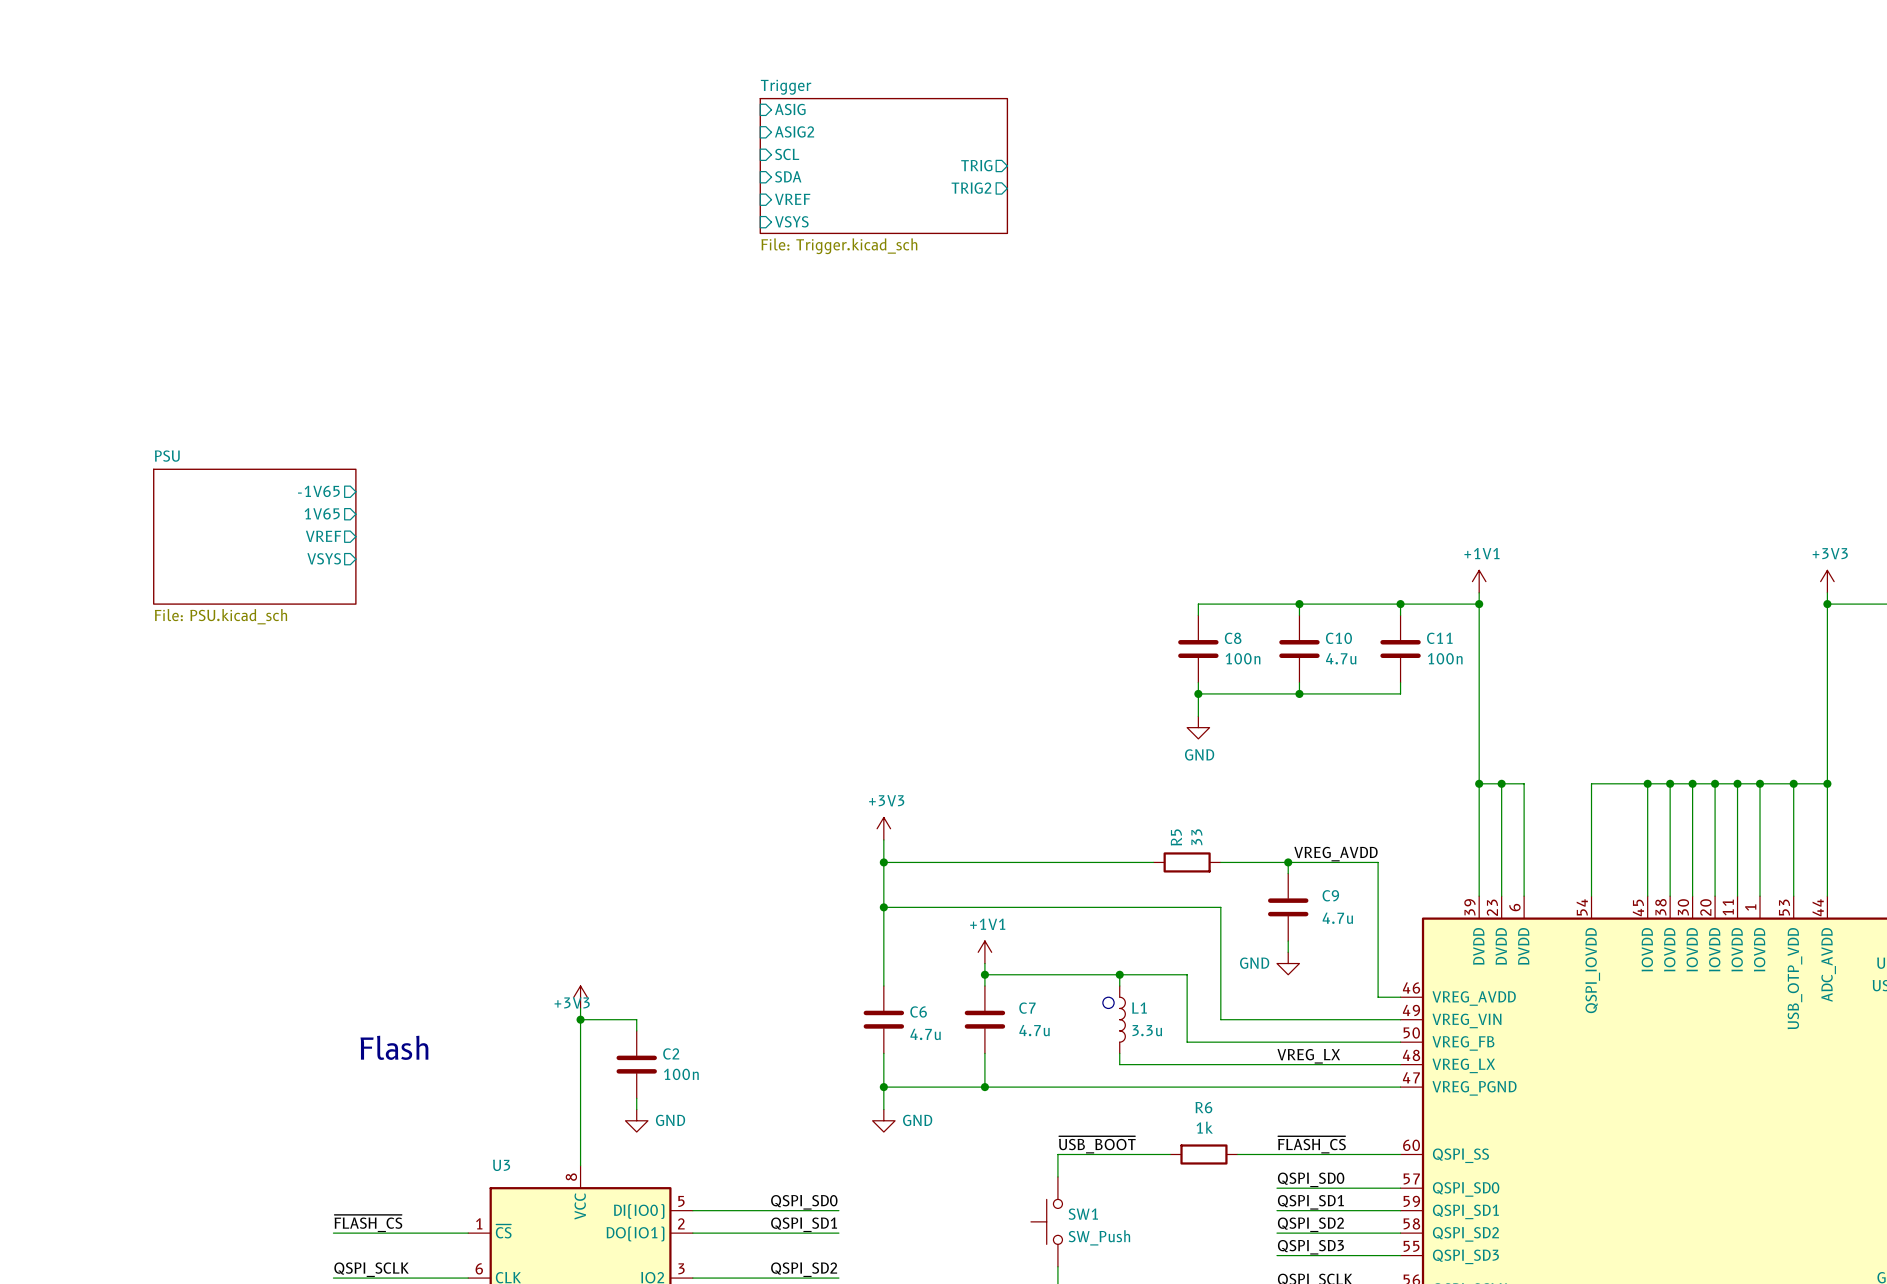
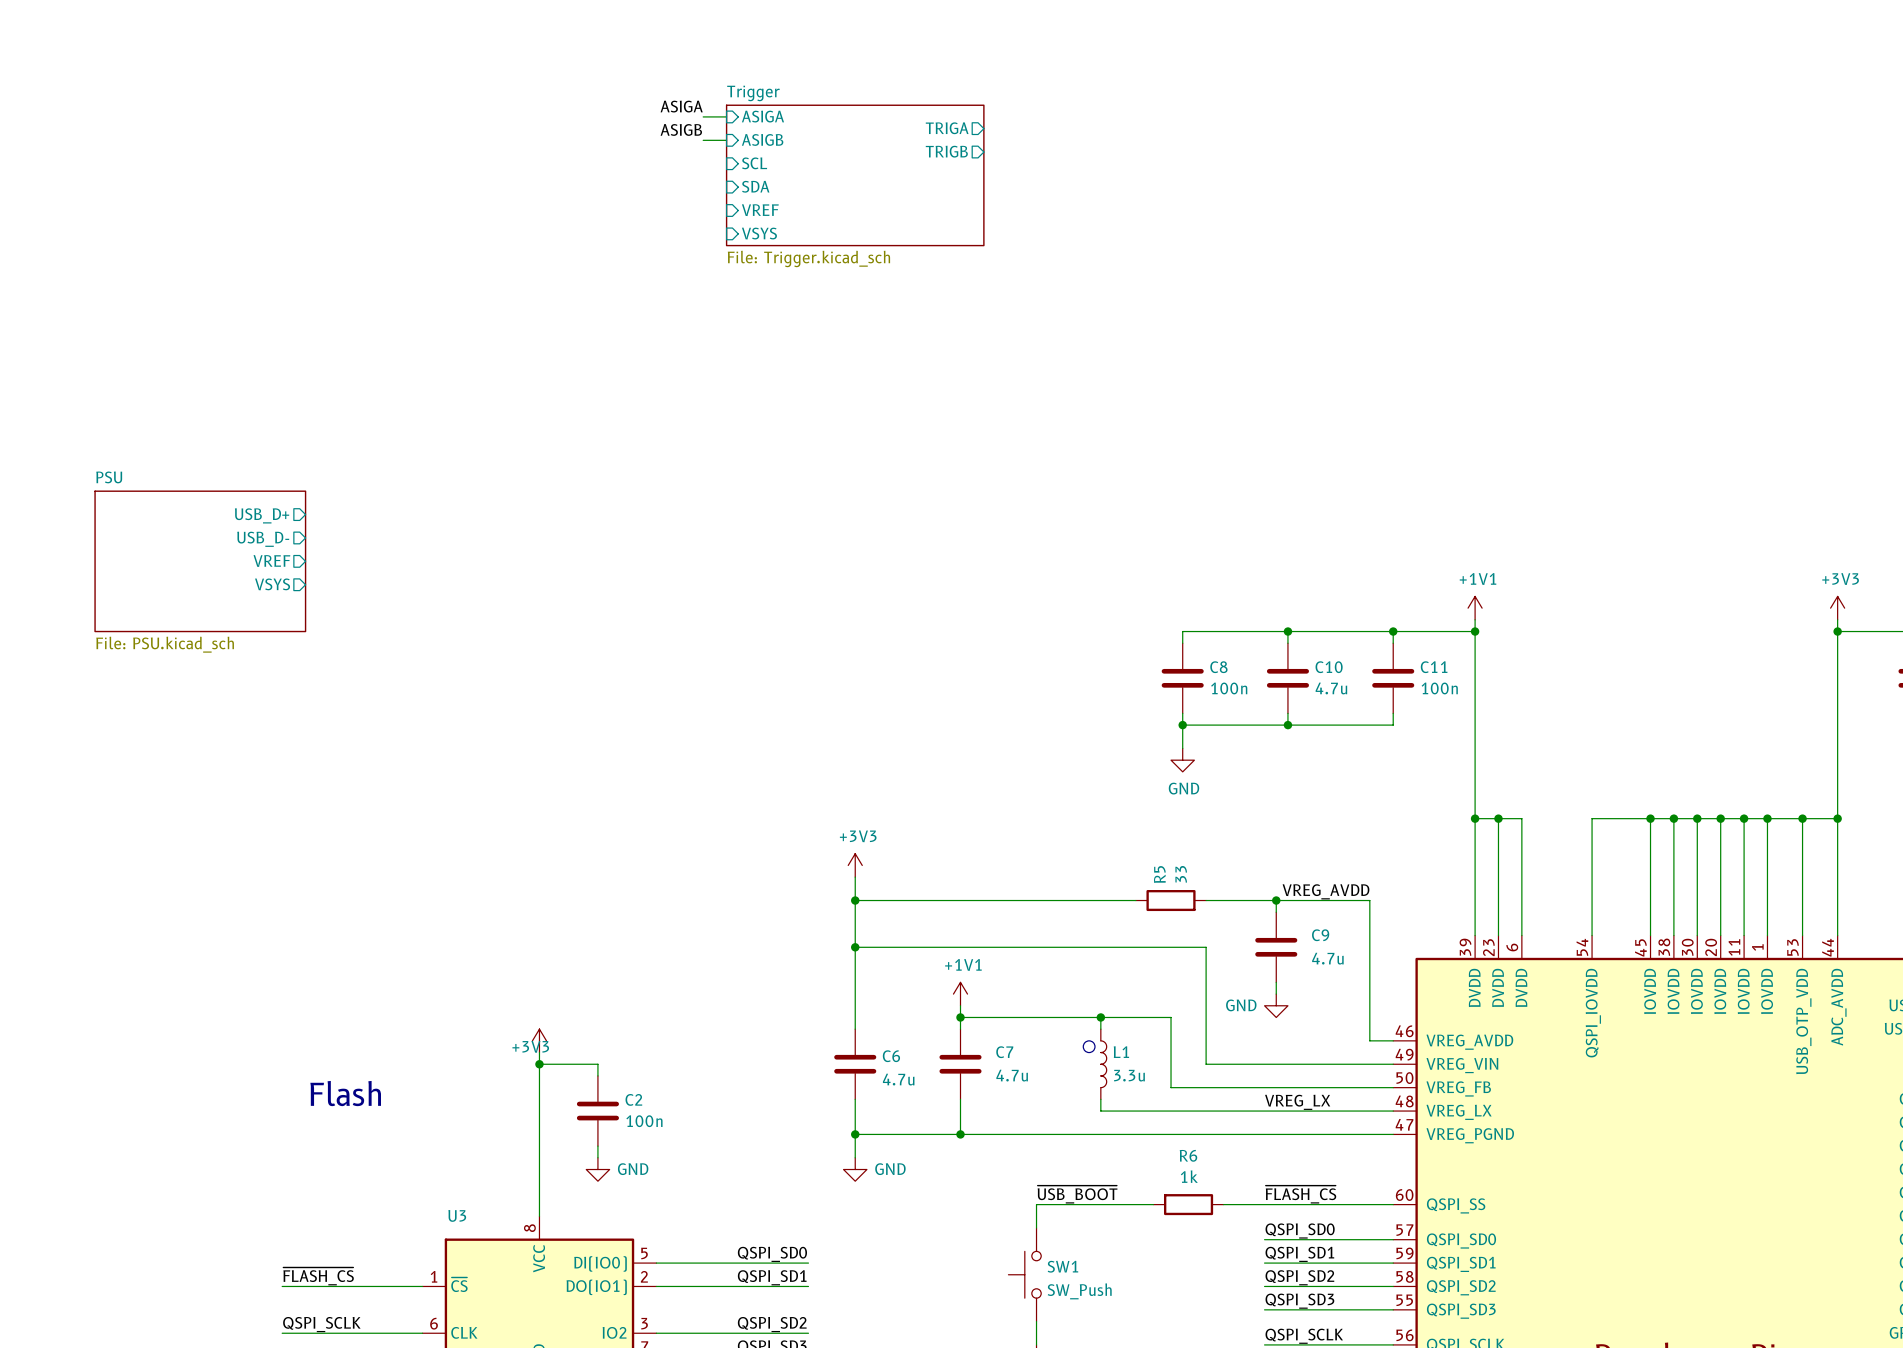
label: none -> ASIGA (681, 106)
wire: none -> (703, 116) (726, 116)
sheet pin: ASIG (790, 109) -> ASIGA (762, 116)
sheet pin: none -> TRIGA (947, 128)
label: none -> ASIGB (681, 129)
sheet pin: ASIG2 (794, 131) -> ASIGB (762, 139)
wire: none -> (703, 140) (726, 140)
sheet pin: TRIG (976, 165) -> TRIGB (946, 151)
sheet pin: TRIG2 (971, 188) -> none
sheet pin: -1V65 (318, 491) -> USB_D+ (262, 515)
sheet pin: 1V65 (322, 513) -> USB_D- (263, 539)

